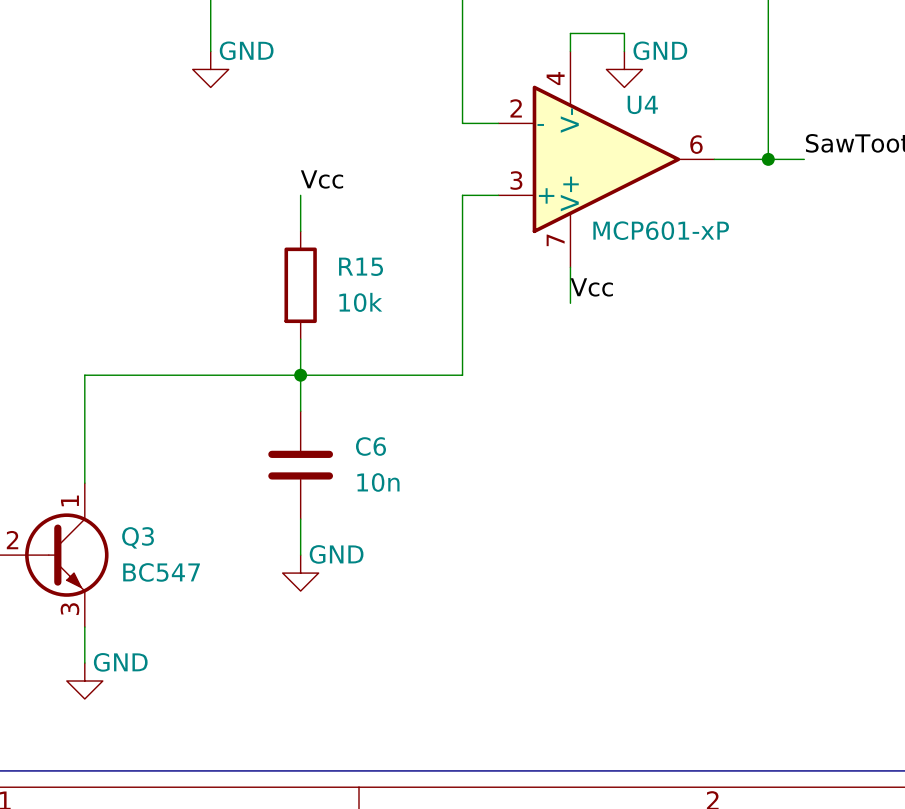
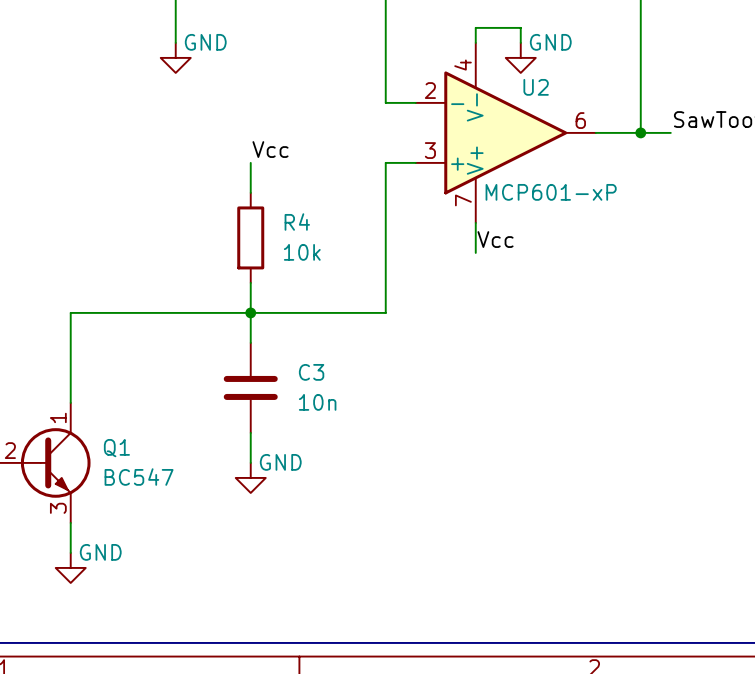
U4 name: U4 (642, 104) -> U2 (536, 87)
R15 name: R15 (361, 266) -> R4 (297, 222)
C6 name: C6 (370, 446) -> C3 (311, 372)
Q3 name: Q3 (138, 537) -> Q1 (116, 448)

